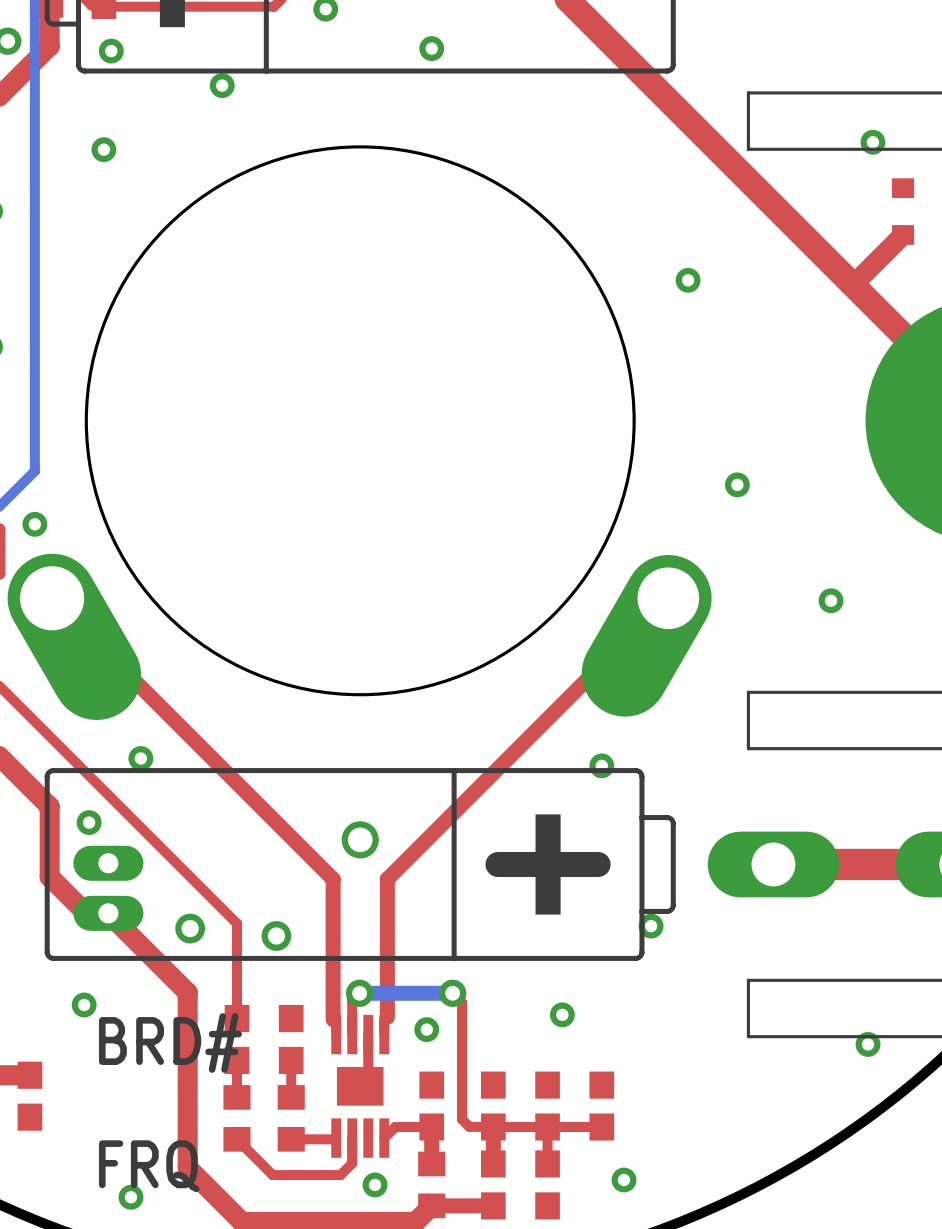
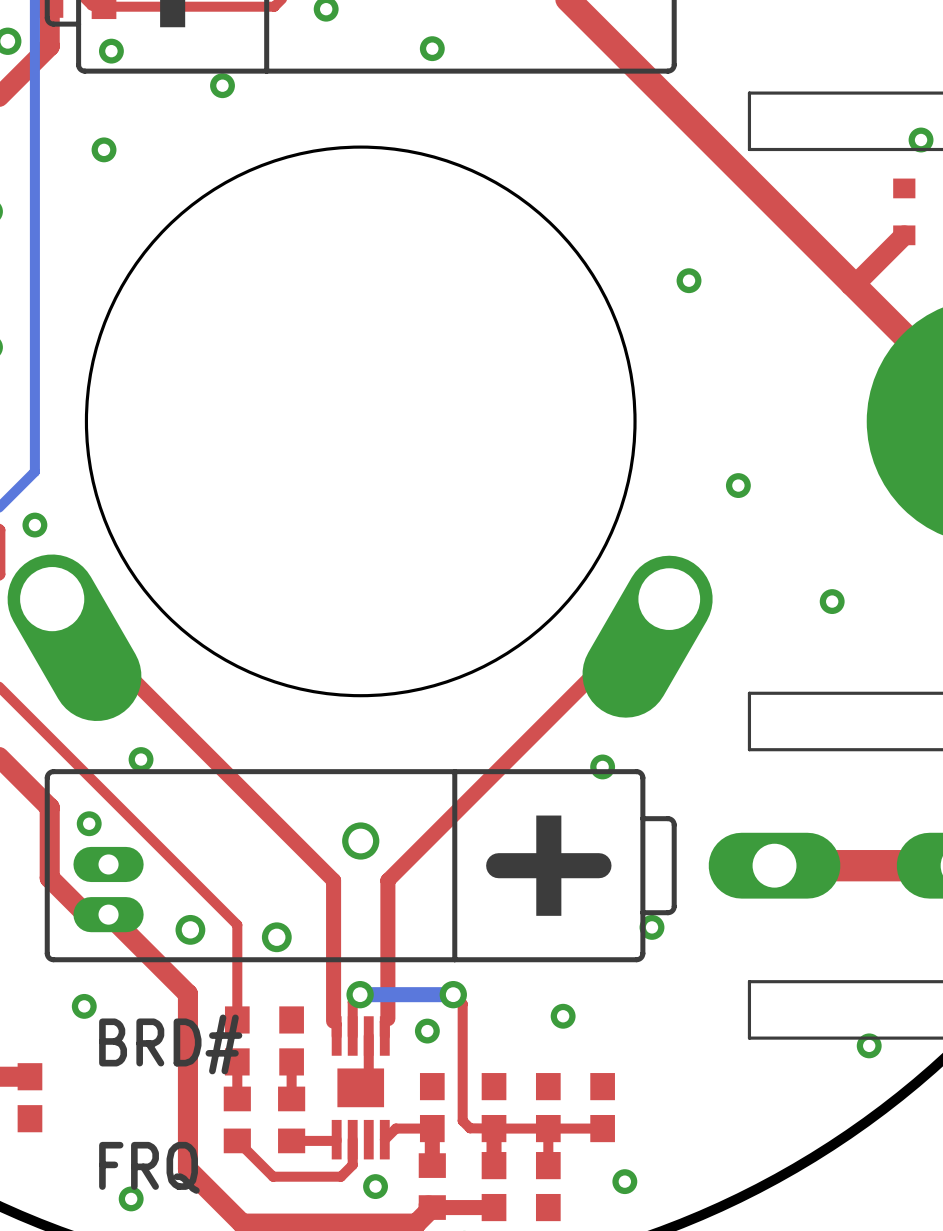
via position: (872, 142) -> (921, 139)

